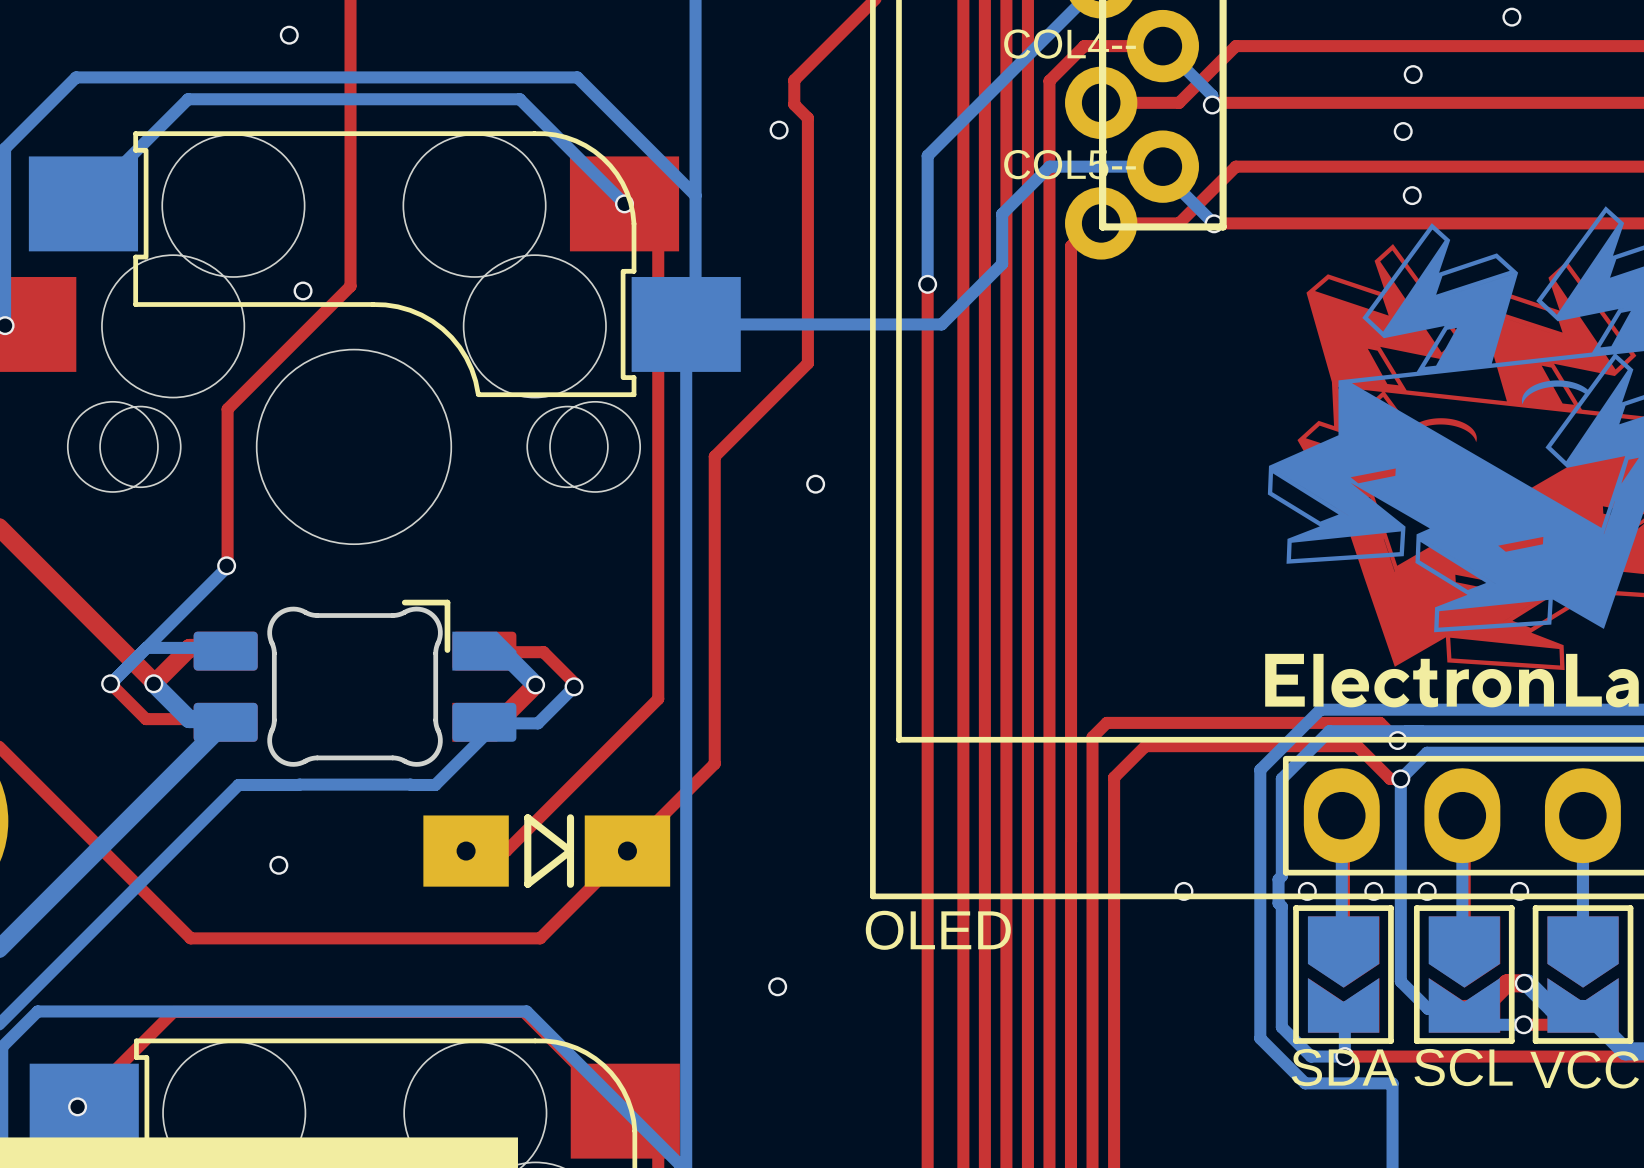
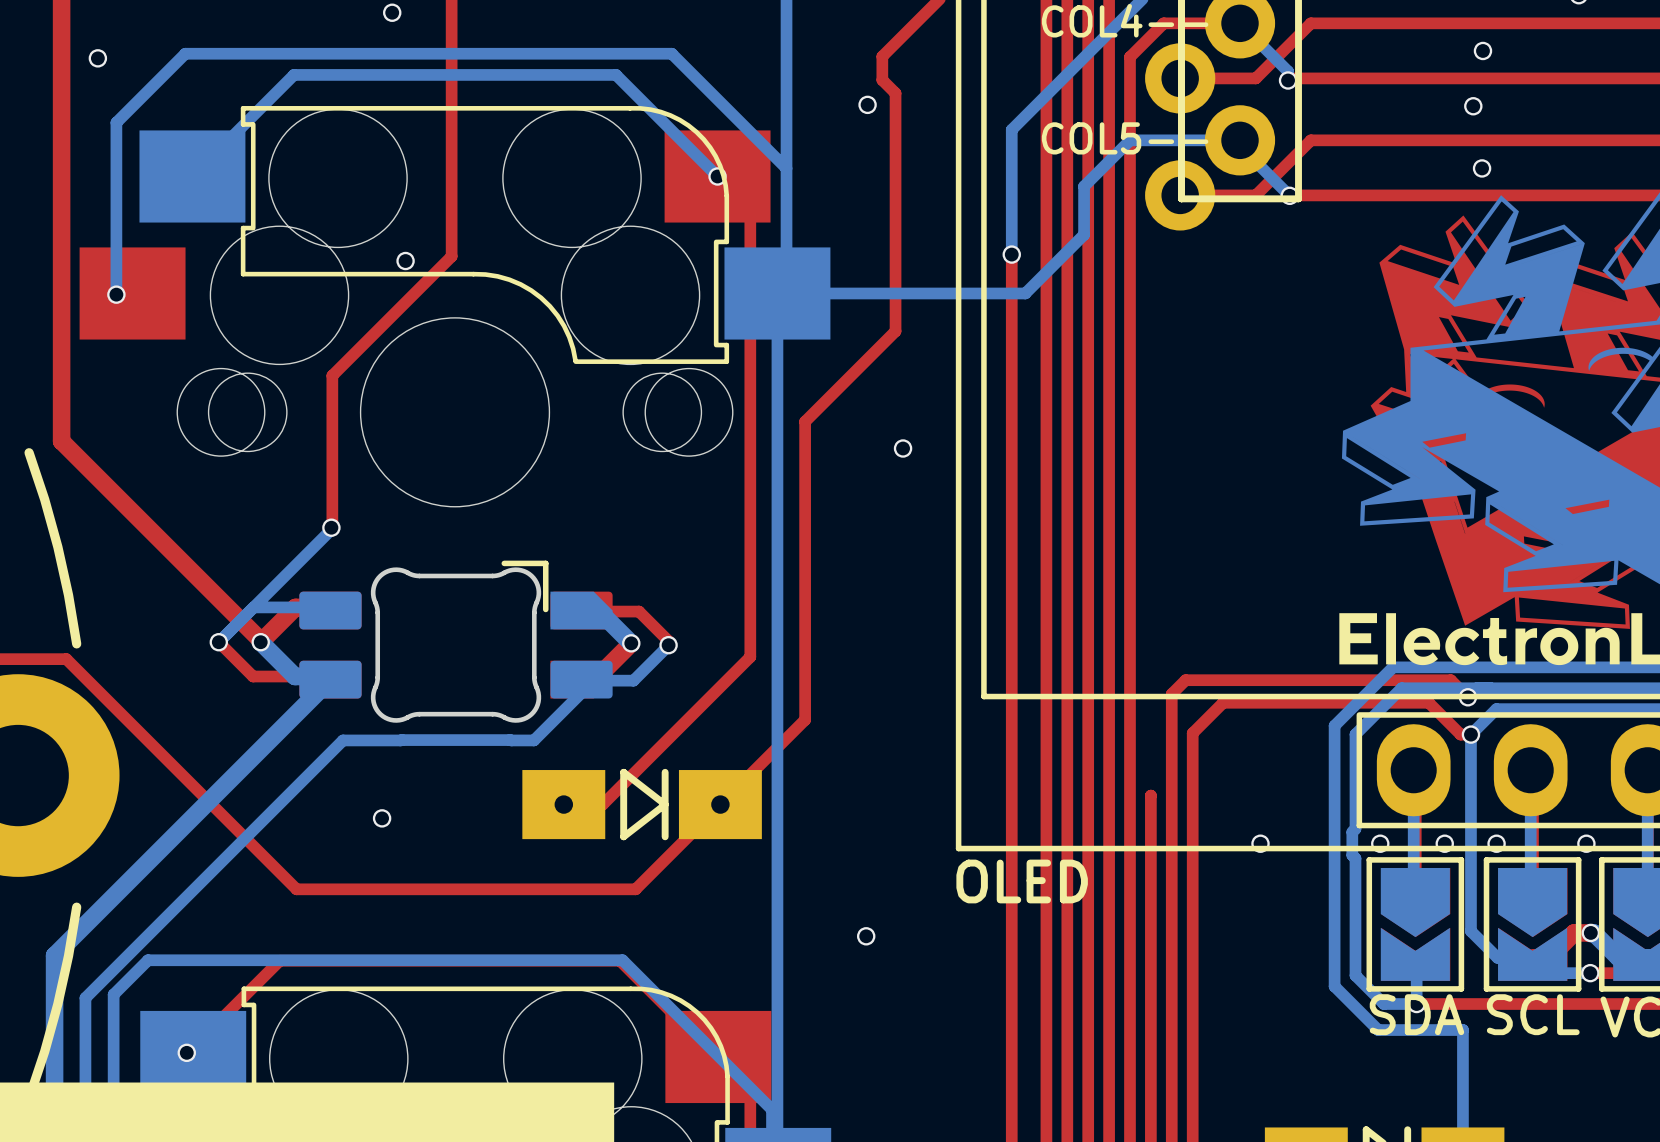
top track: (1093, 223) (1071, 246) (1070, 841) -> none

